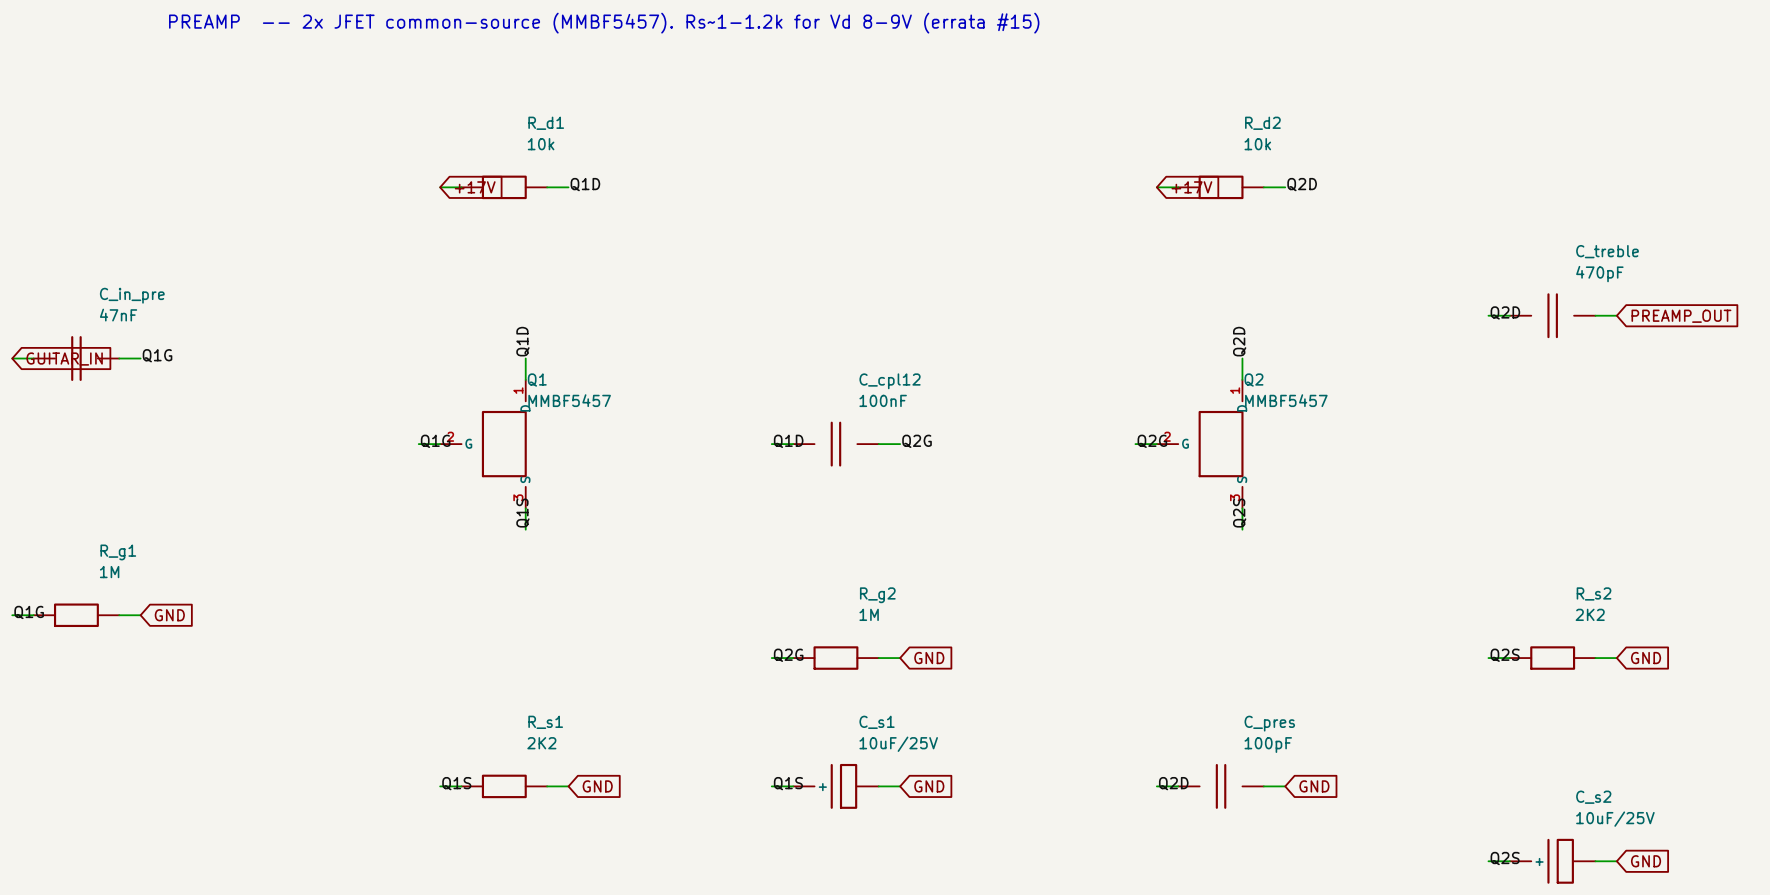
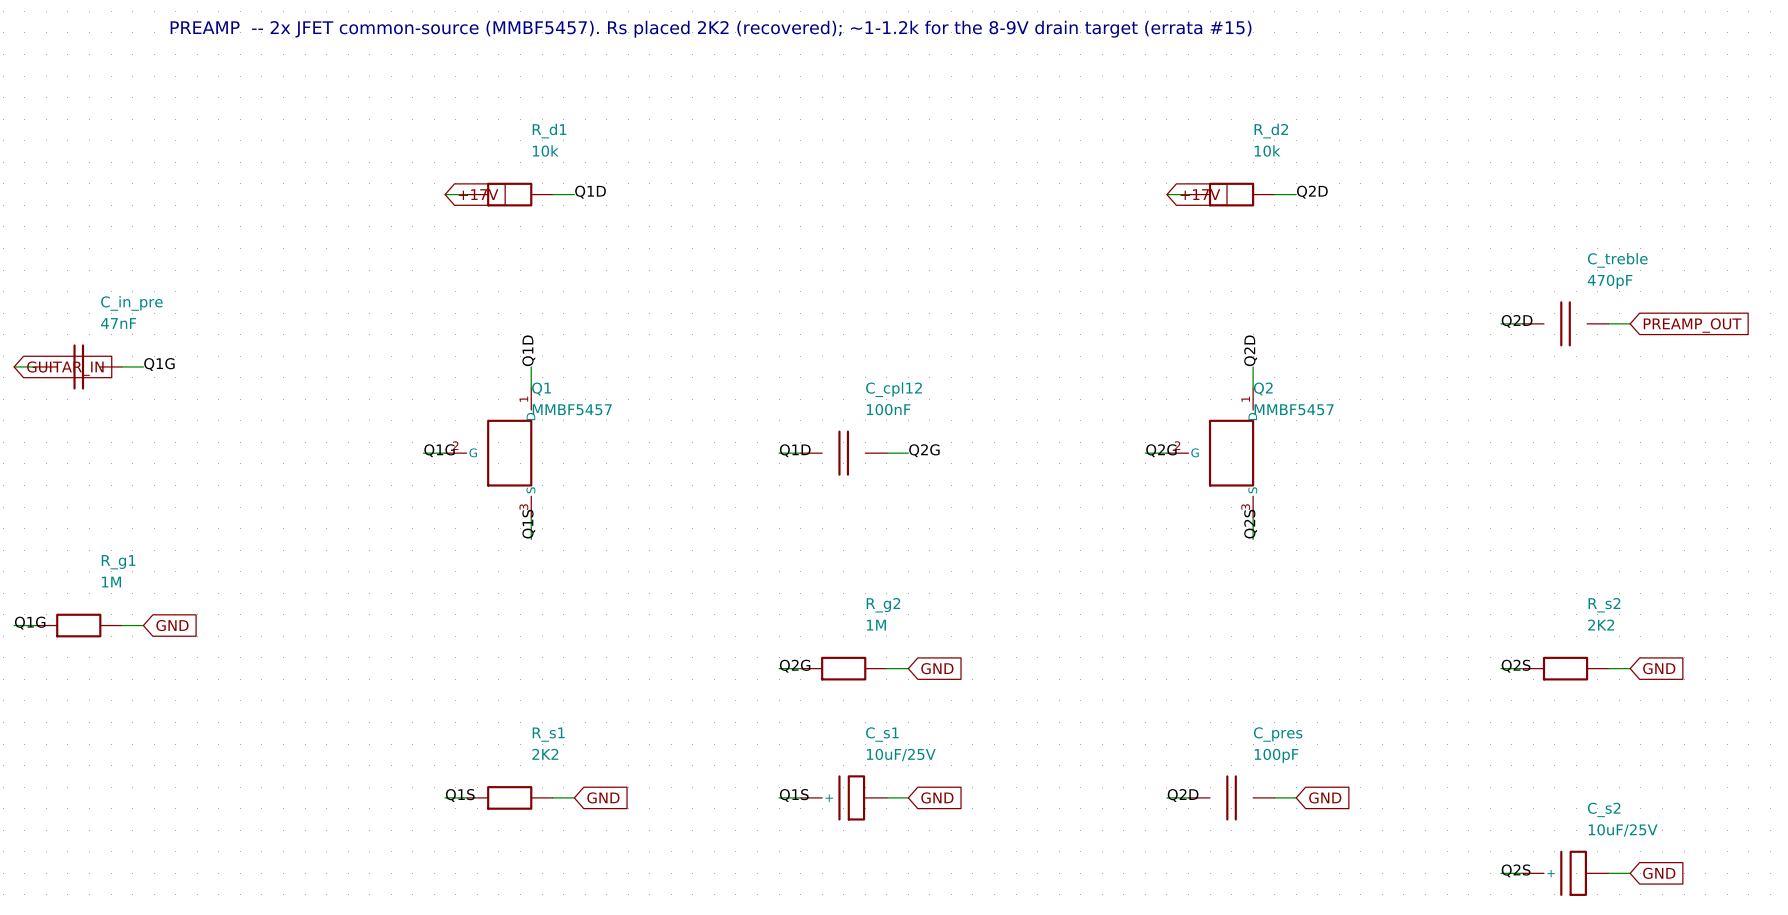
text: PREAMP -- 2x JFET common-source (MMBF5457). Rs~1-1.2k for Vd 8-9V (errata #15) (604, 23) -> PREAMP -- 2x JFET common-source (MMBF5457). Rs placed 2K2 (recovered); ~1-1.2k for the 8-9V drain target (errata #15) (711, 29)

